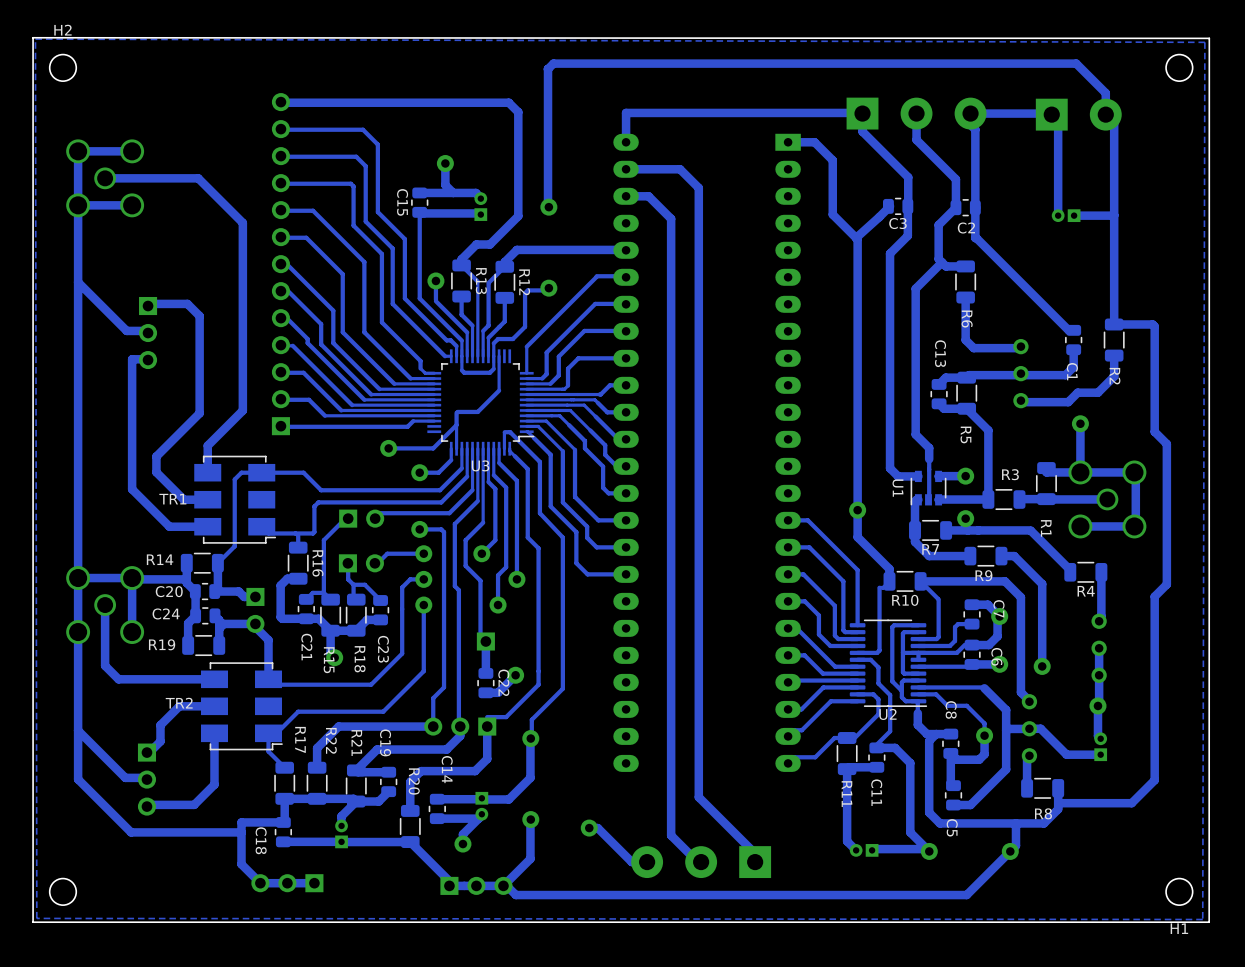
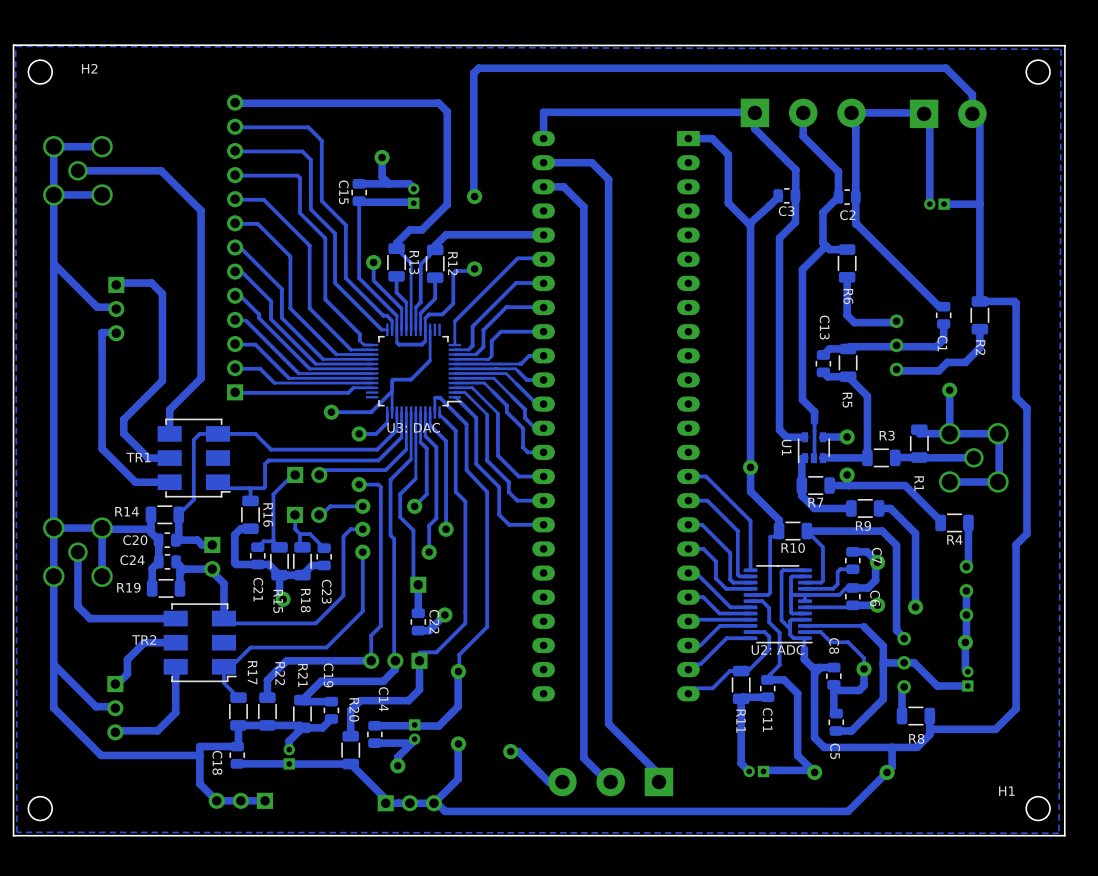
H2 name position: H2 (62, 30) -> H2 (89, 68)
U3 name: U3 (480, 465) -> U3: DAC (413, 427)
U2 name: U2 (887, 714) -> U2: ADC (777, 649)
H1 name position: H1 (1179, 928) -> H1 (1006, 791)

